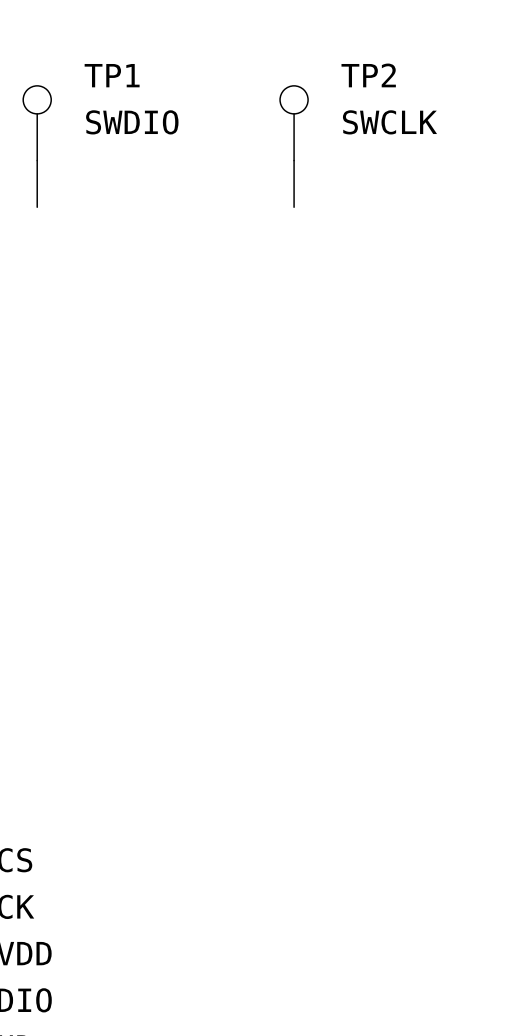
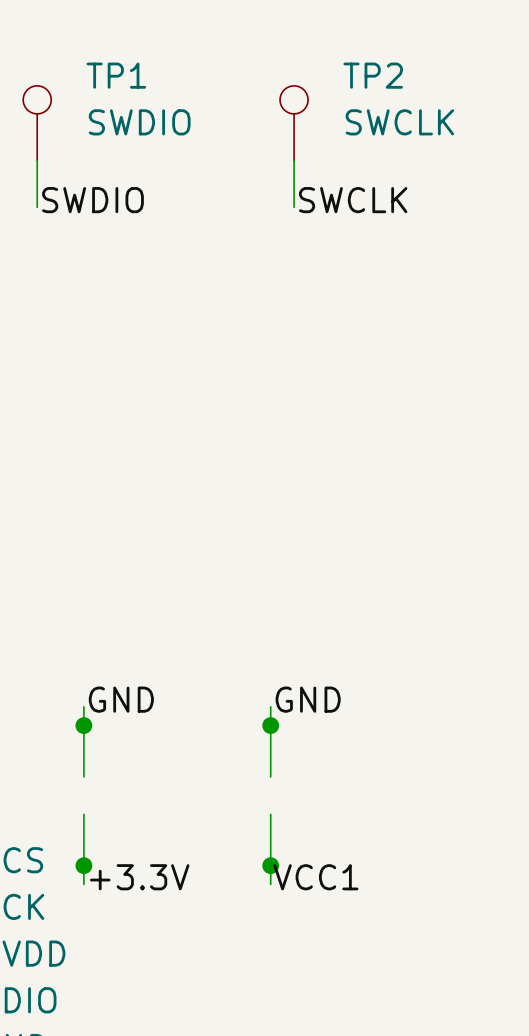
label: none -> SWDIO (92, 200)
label: none -> SWCLK (353, 200)
label: none -> GND (121, 699)
label: none -> GND (308, 699)
wire: none -> (83, 706) (83, 776)
wire: none -> (270, 706) (270, 776)
junction: none -> (83, 725)
junction: none -> (270, 725)
wire: none -> (83, 814) (83, 884)
wire: none -> (270, 814) (270, 884)
junction: none -> (83, 865)
junction: none -> (270, 865)
label: none -> +3.3V (139, 877)
label: none -> VCC1 (315, 877)

